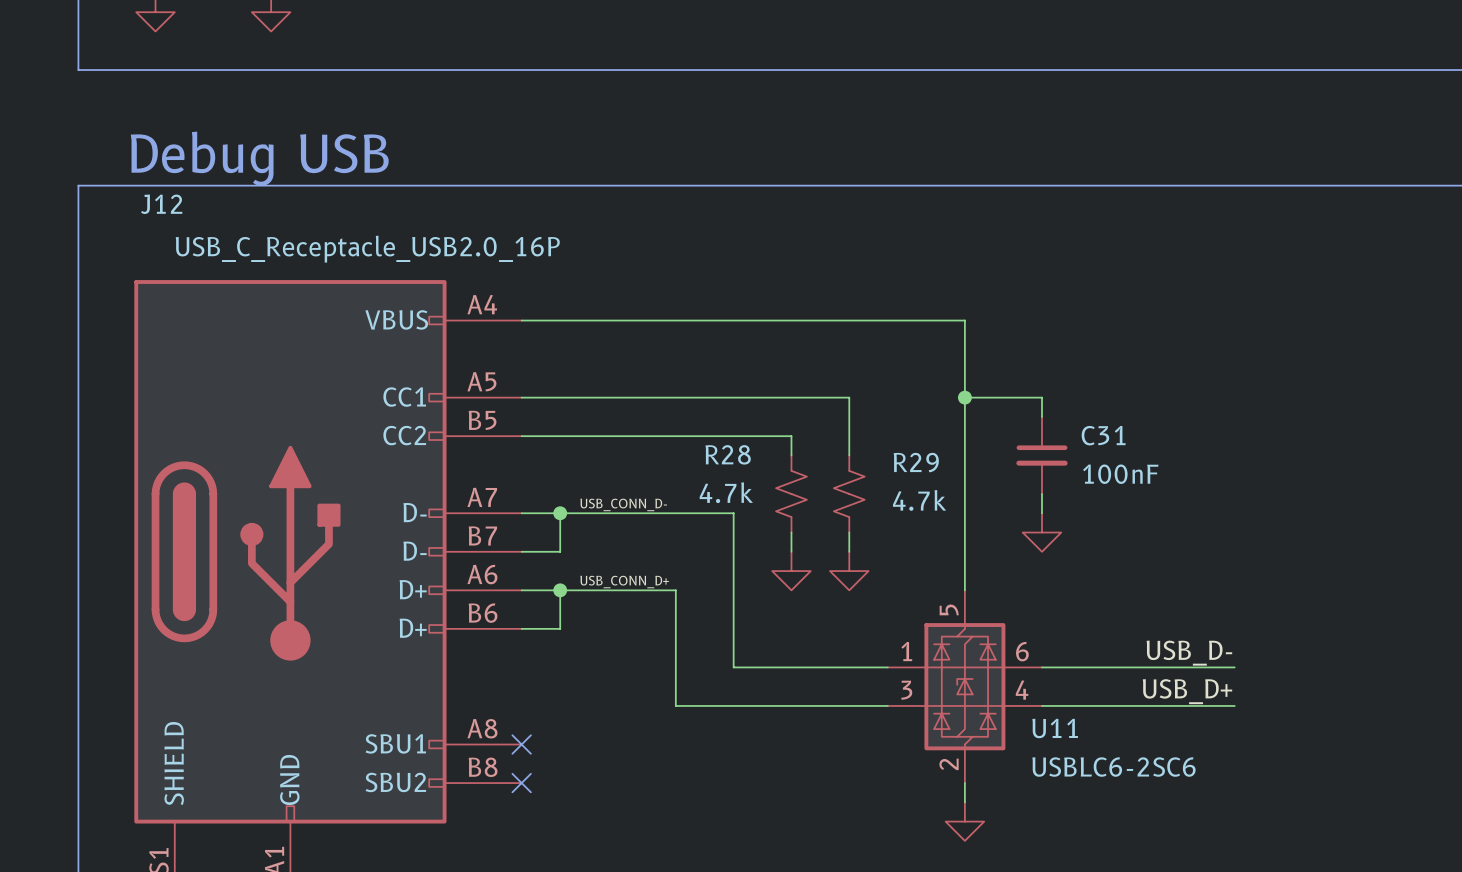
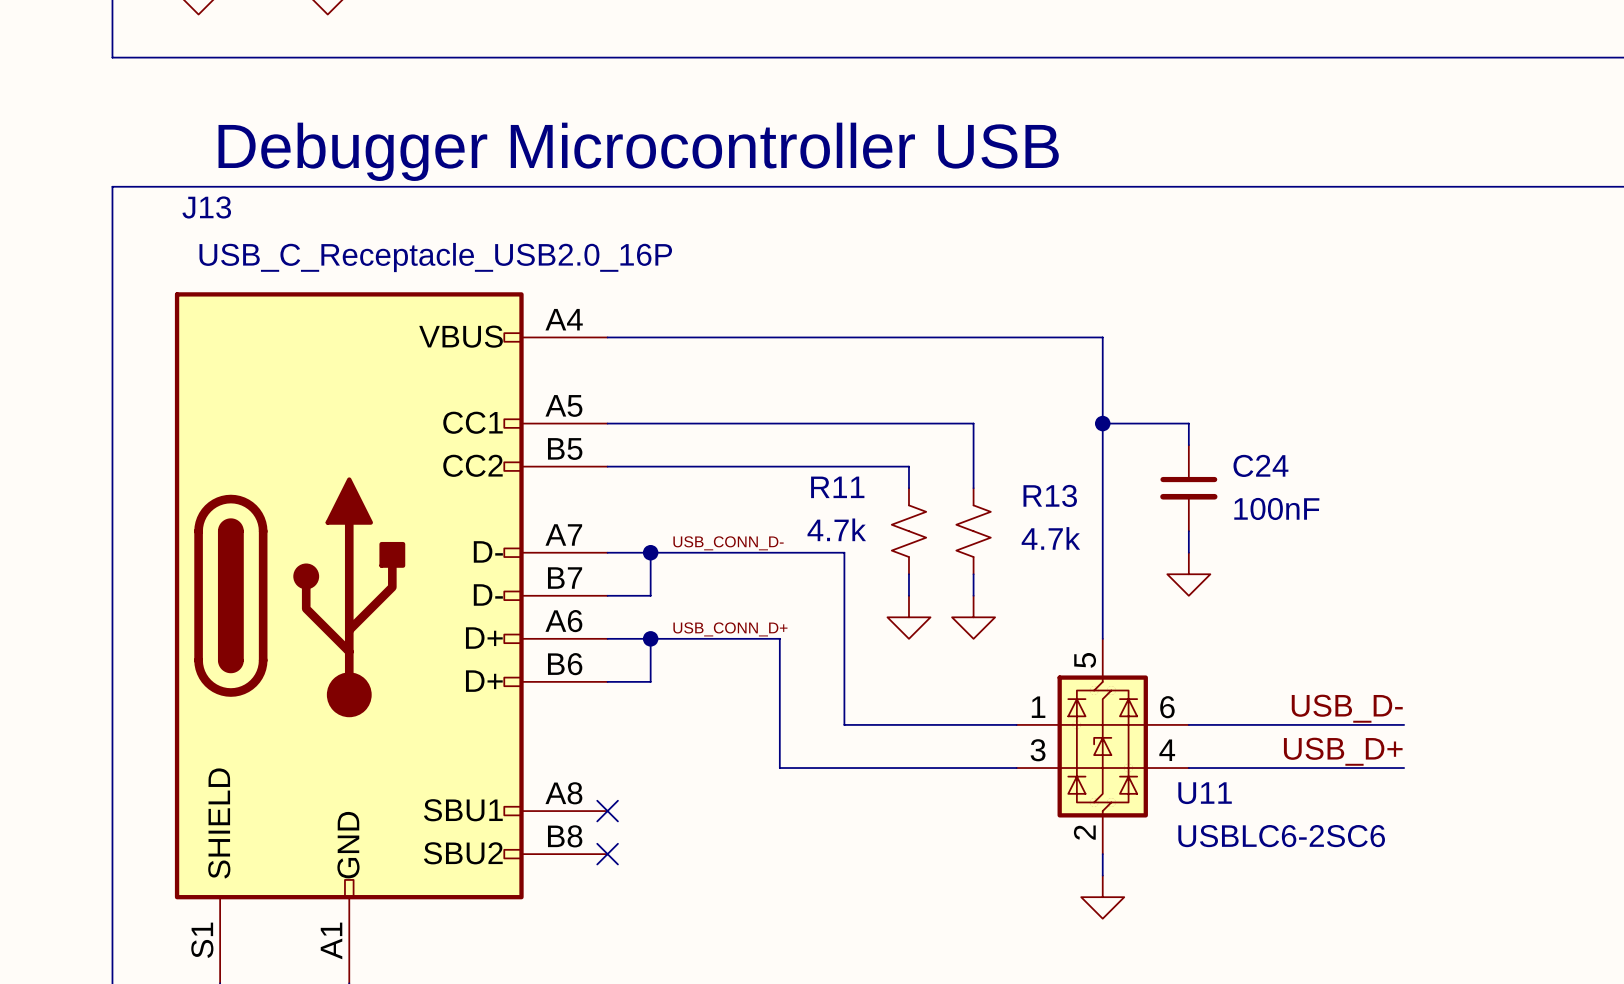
text: none -> Debugger Microcontroller USB (638, 151)
text: Debug USB (259, 158) -> none
J12 name: J12 (161, 204) -> J13 (206, 207)
C31 name: C31 (1103, 435) -> C24 (1260, 465)
R28 name: R28 (728, 454) -> R11 (837, 487)
R29 name: R29 (916, 462) -> R13 (1050, 495)

